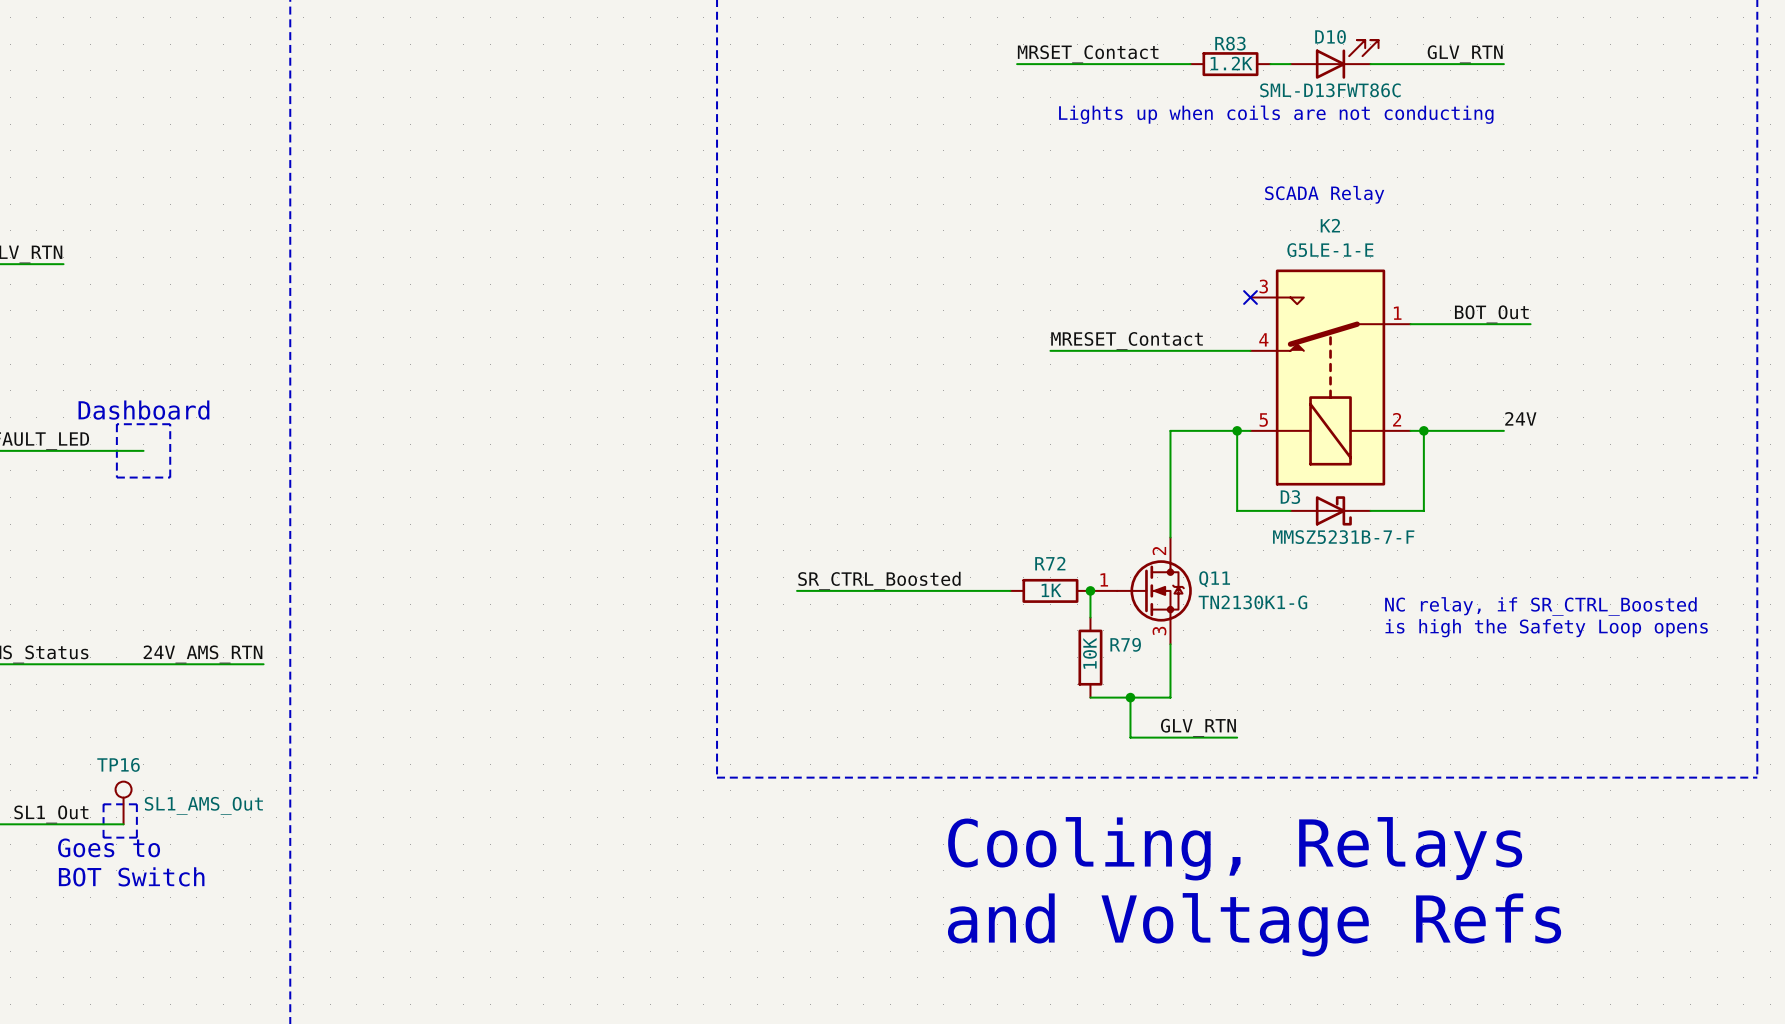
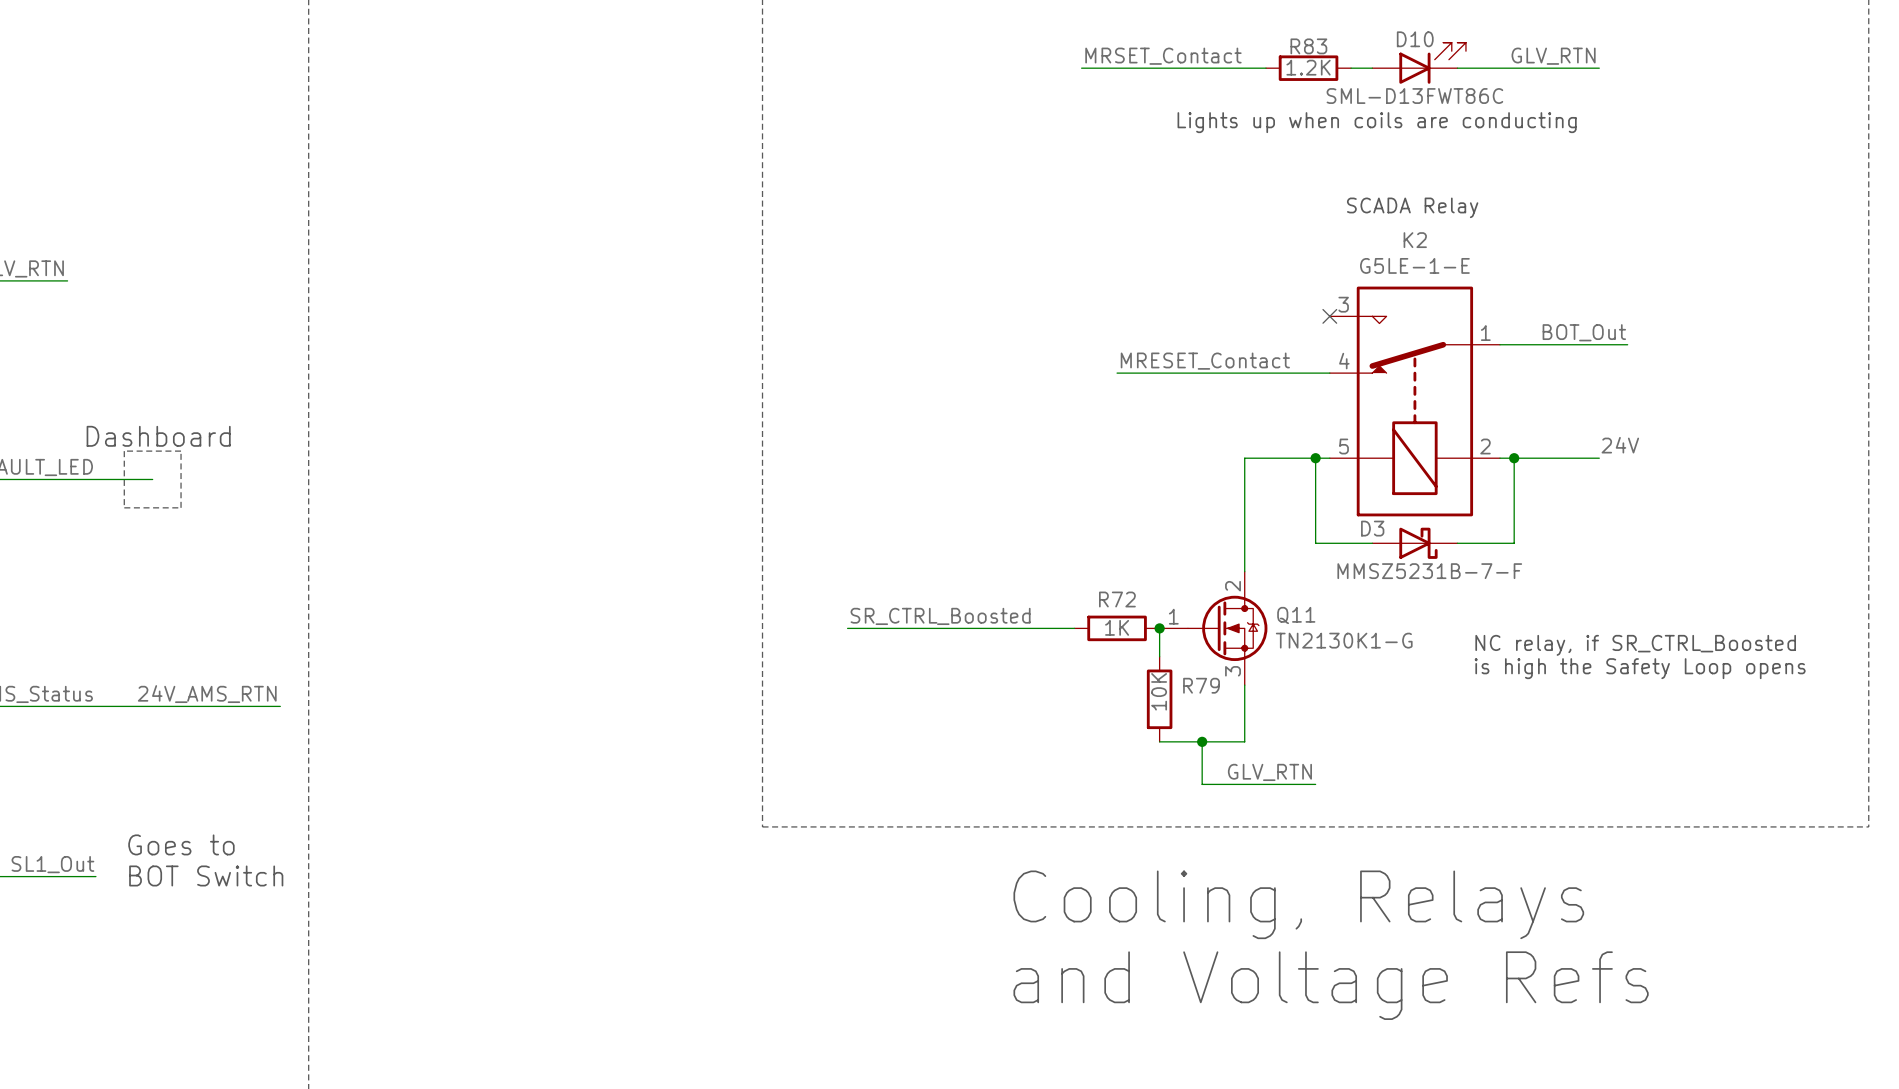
text: Lights up when coils are not conducting (1276, 114) -> Lights up when coils are conducting (1377, 122)
TP16: SL1_AMS_Out (123, 802) -> none
line: (103, 804) (136, 804) (136, 837) (103, 837) (103, 804) -> none
wire: (90, 824) (123, 824) -> none
text position: Goes to (109, 847) -> Goes to (181, 844)
text position: BOT Switch (131, 876) -> BOT Switch (206, 875)

